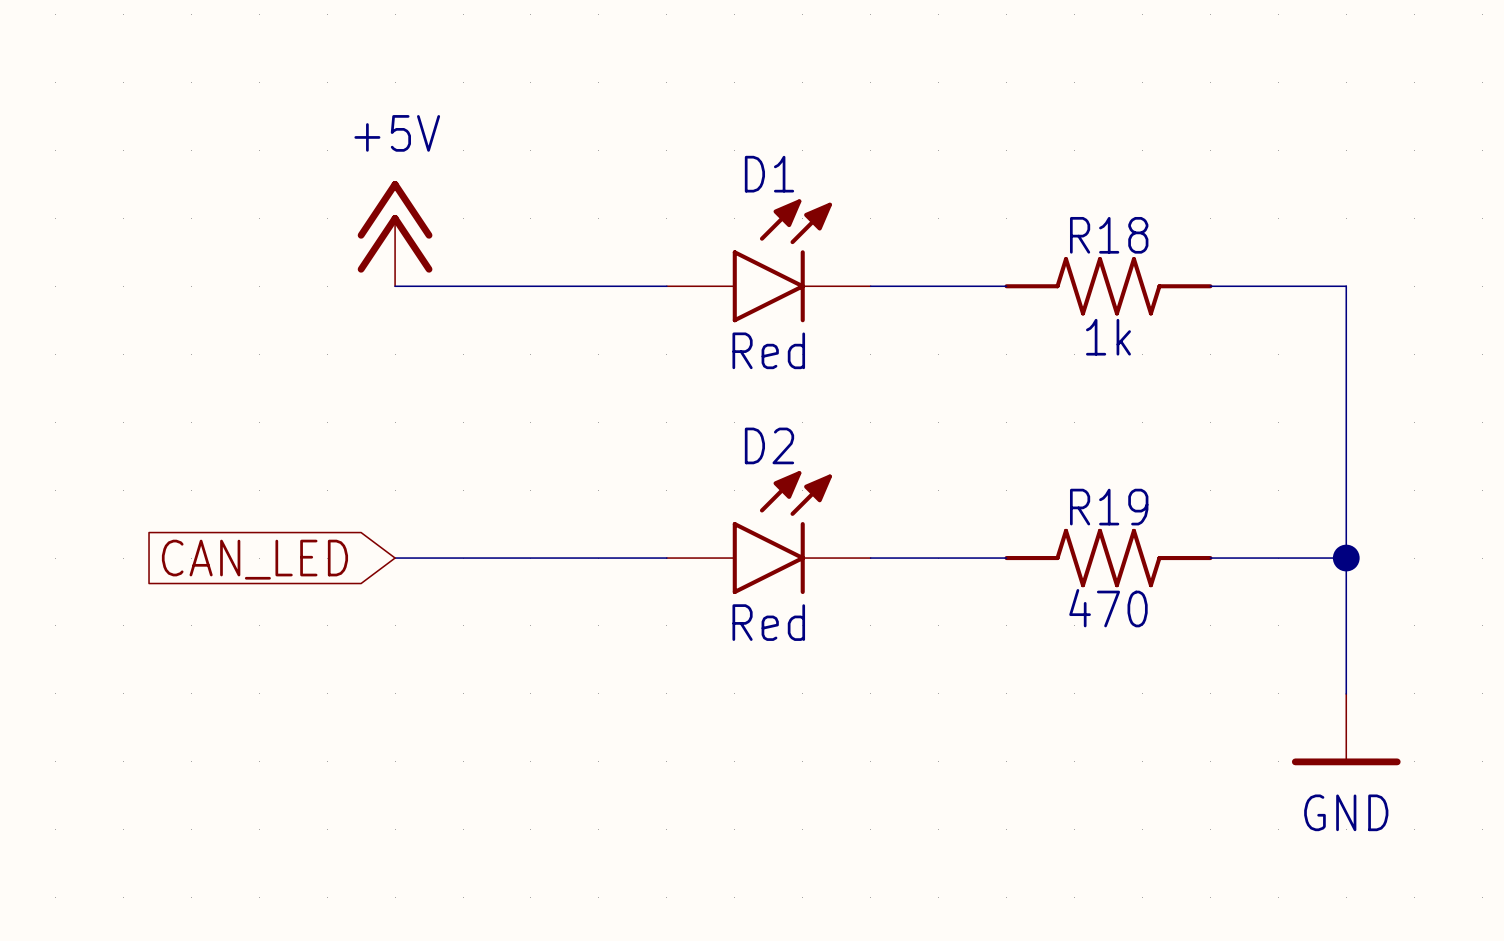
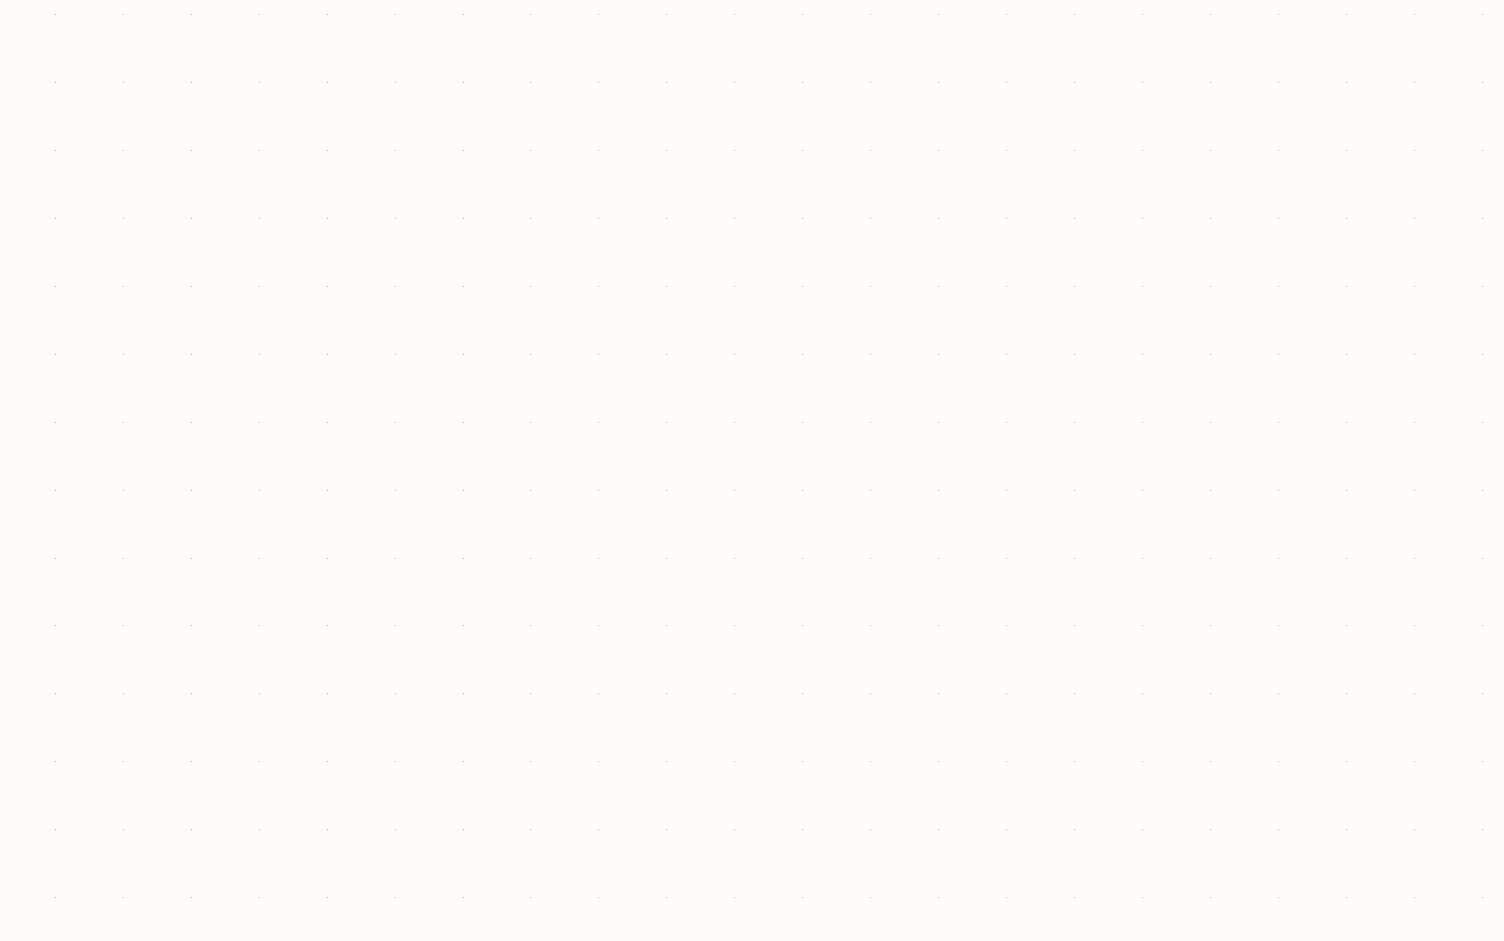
power symbol: +5V (395, 233) -> none
D1: (768, 260) -> none
wire: (395, 286) (666, 286) -> none
wire: (870, 286) (1006, 286) -> none
R18: (1108, 286) -> none
wire: (1210, 286) (1346, 286) (1346, 693) -> none
D2: (768, 532) -> none
wire: (395, 558) (666, 558) -> none
wire: (870, 558) (1006, 558) -> none
R19: (1108, 558) -> none
wire: (1210, 558) (1346, 558) -> none
junction: (1346, 558) -> none
global label: CAN_LED (254, 559) -> none
power symbol: GND (1346, 729) -> none

